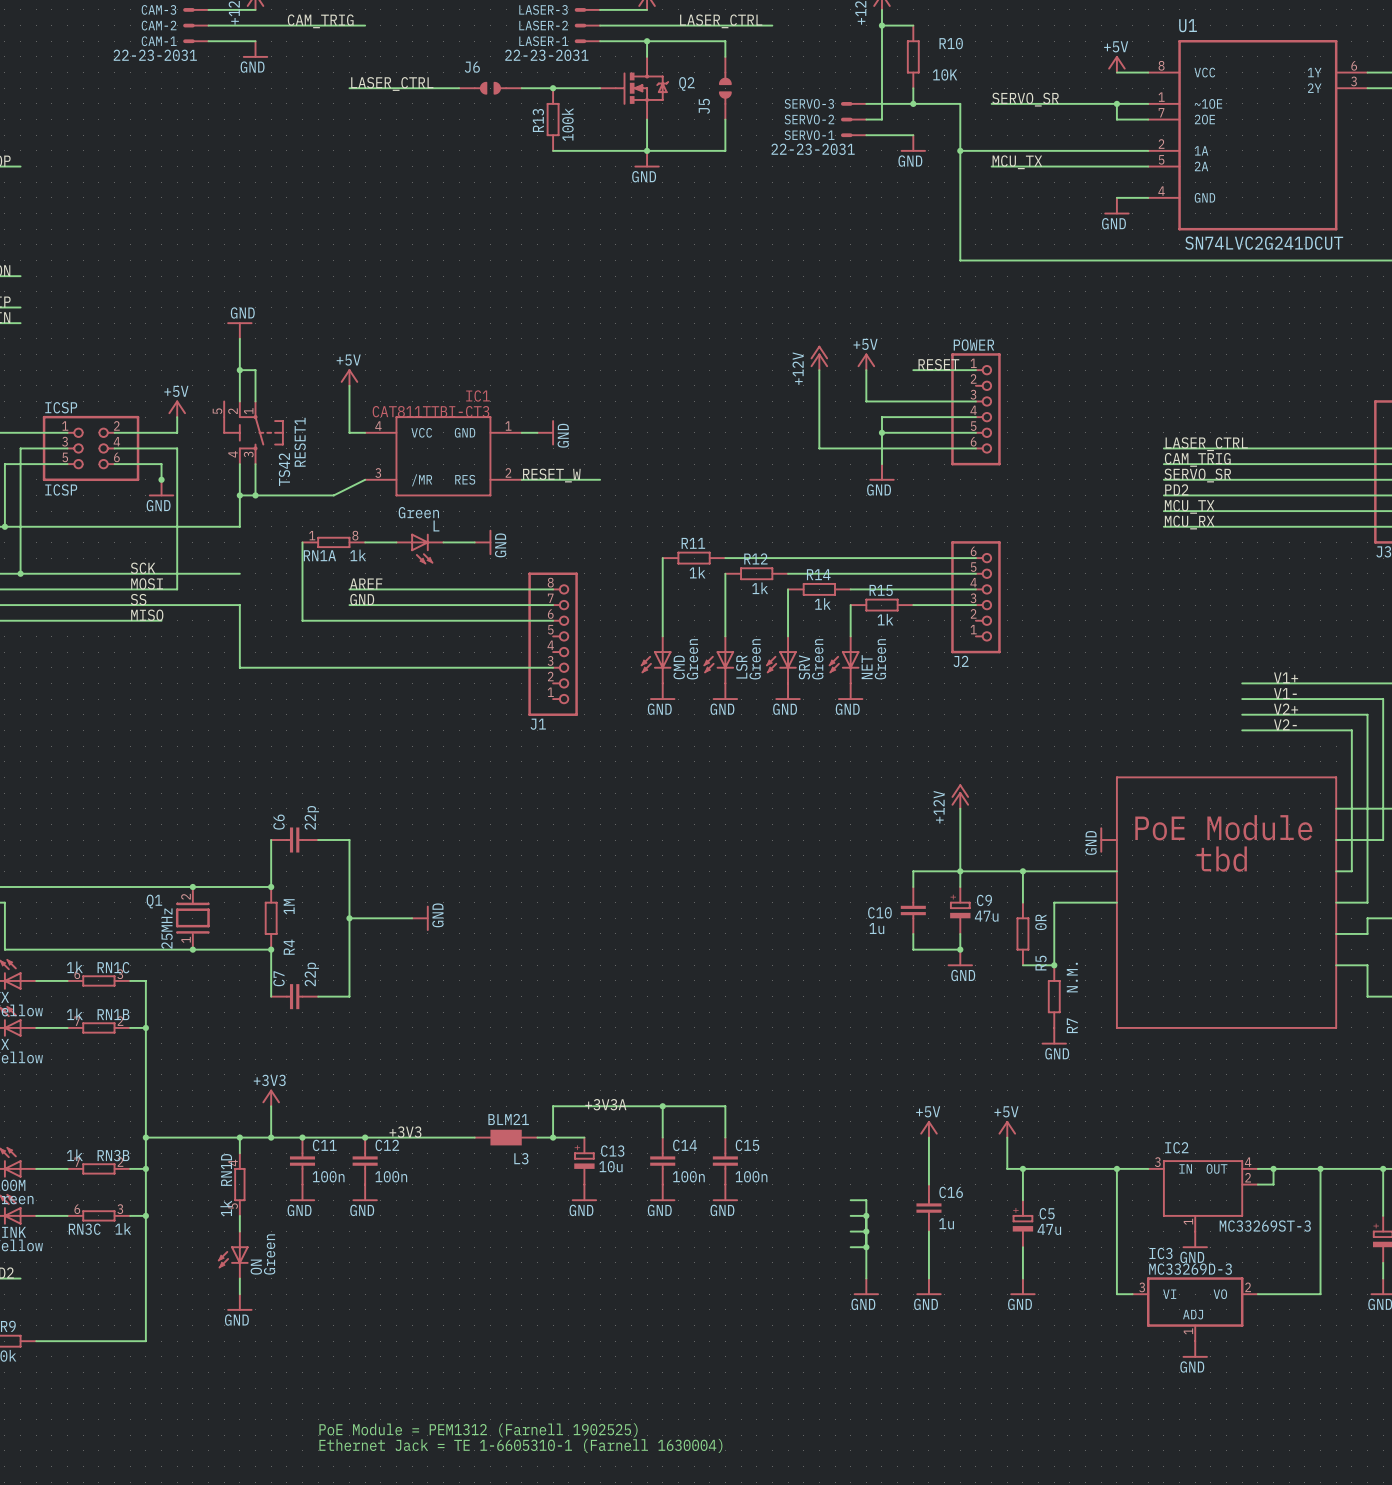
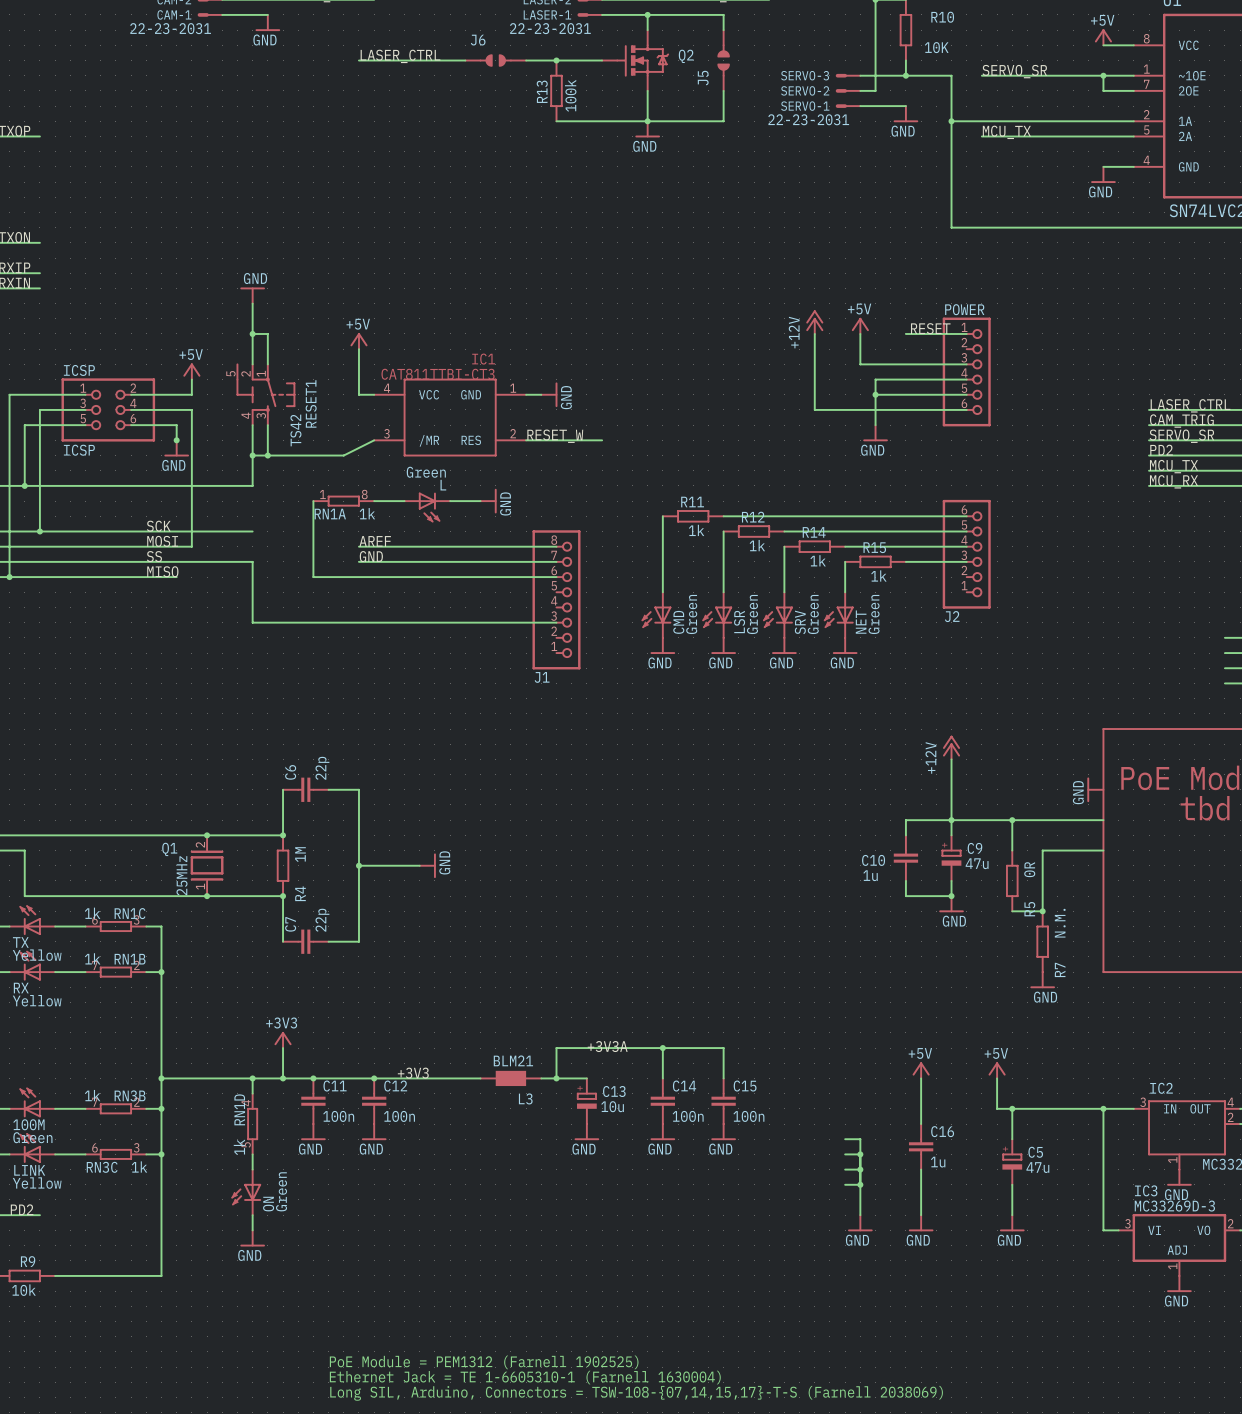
text: none -> Long SIL, Arduino, Connectors = TSW-108-{07,14,15,17}-T-S (Farnell 2038069) (636, 1393)

